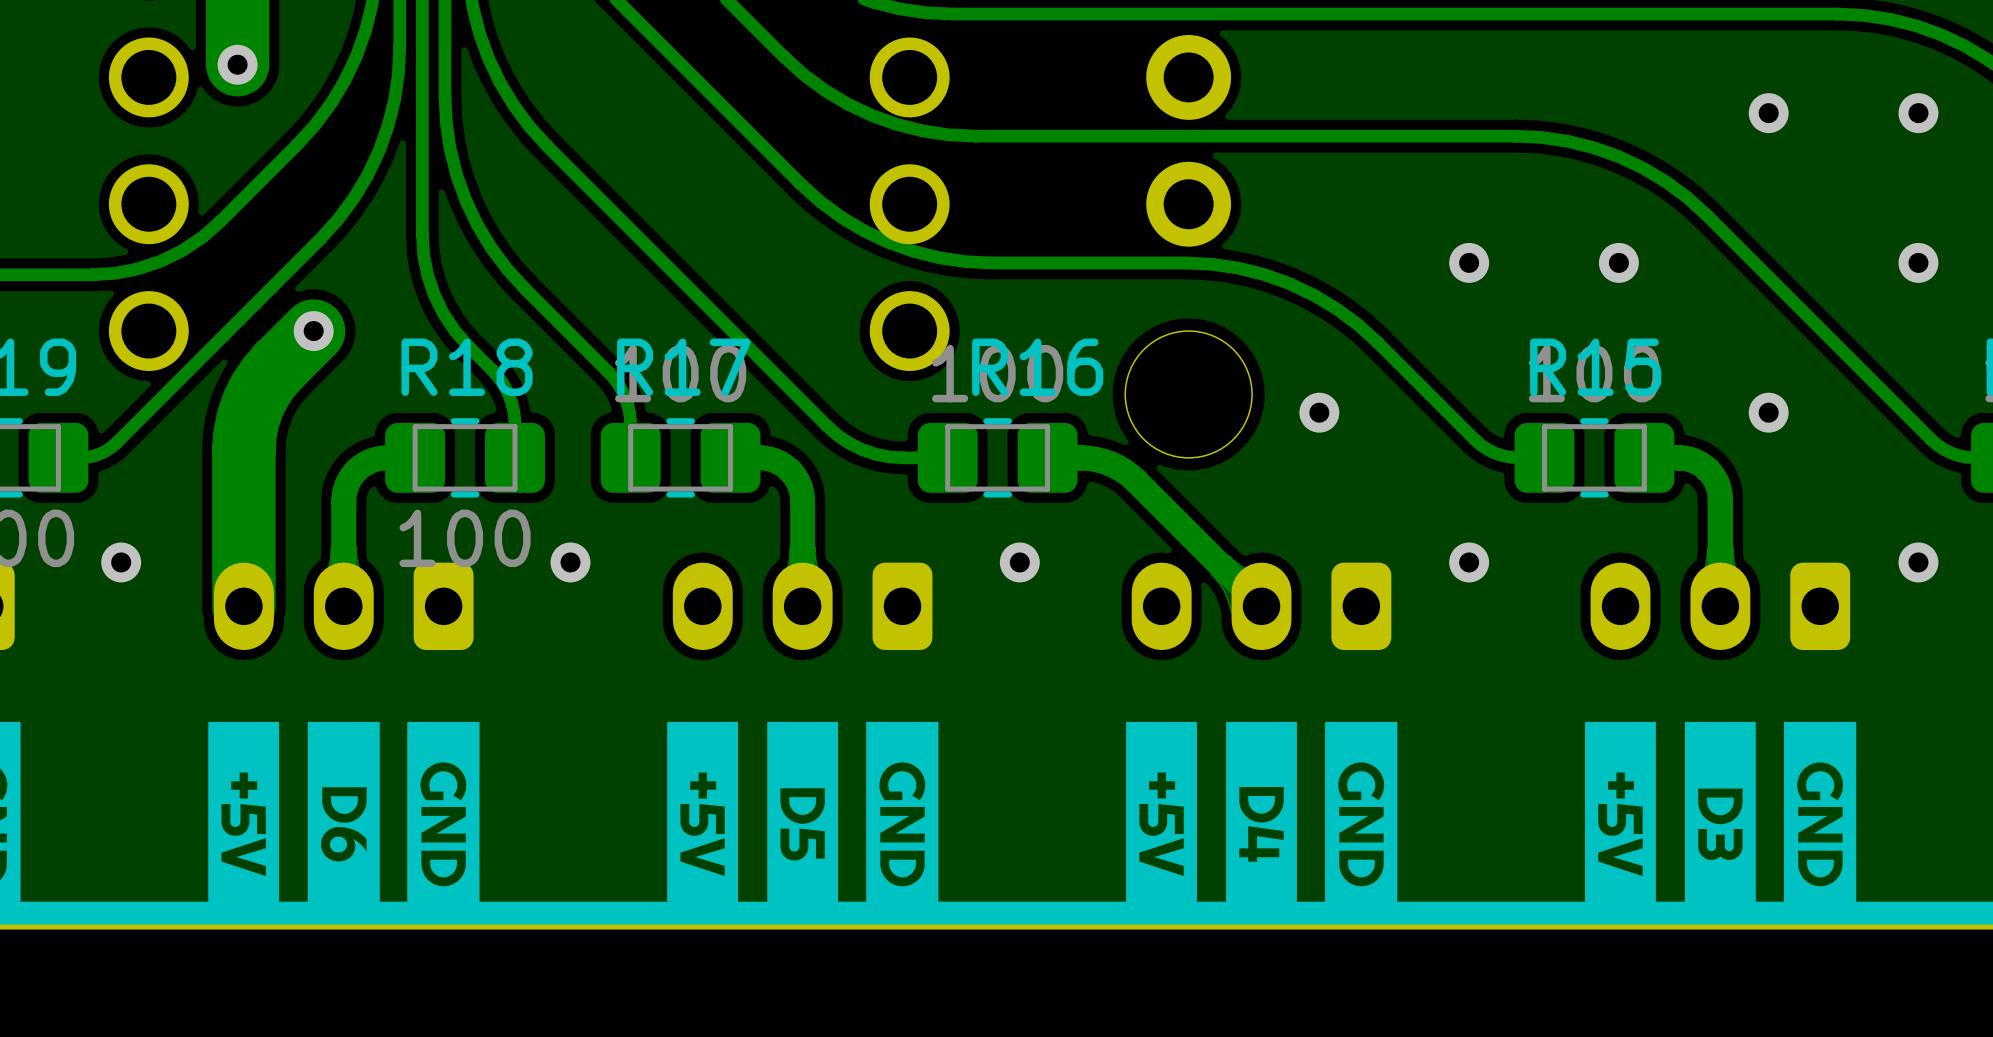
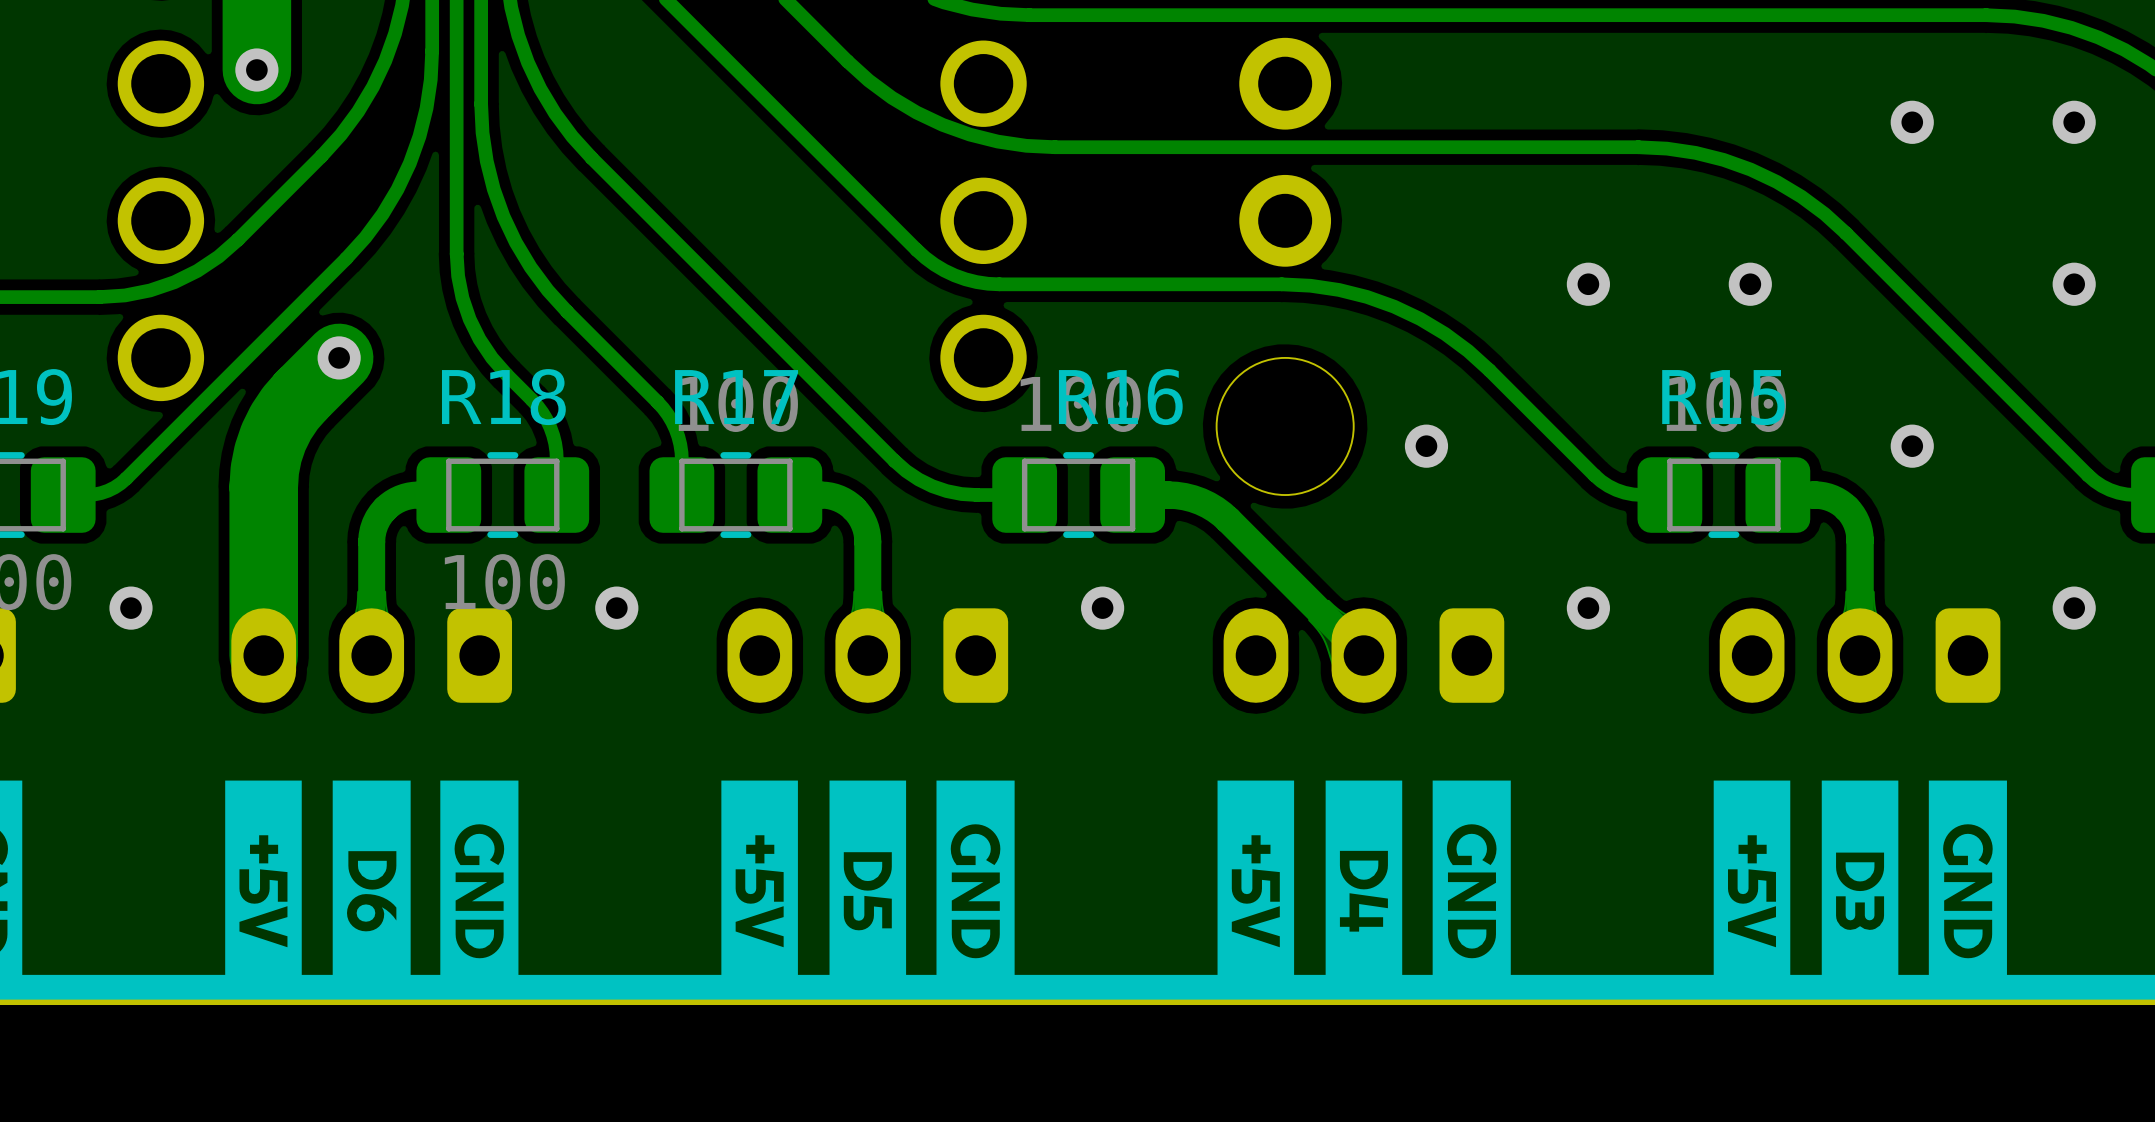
track: (800, 183) (841, 217) (888, 242) (939, 257) (992, 262) -> (865, 198) (925, 257) (954, 275) (988, 283) (1072, 284)

